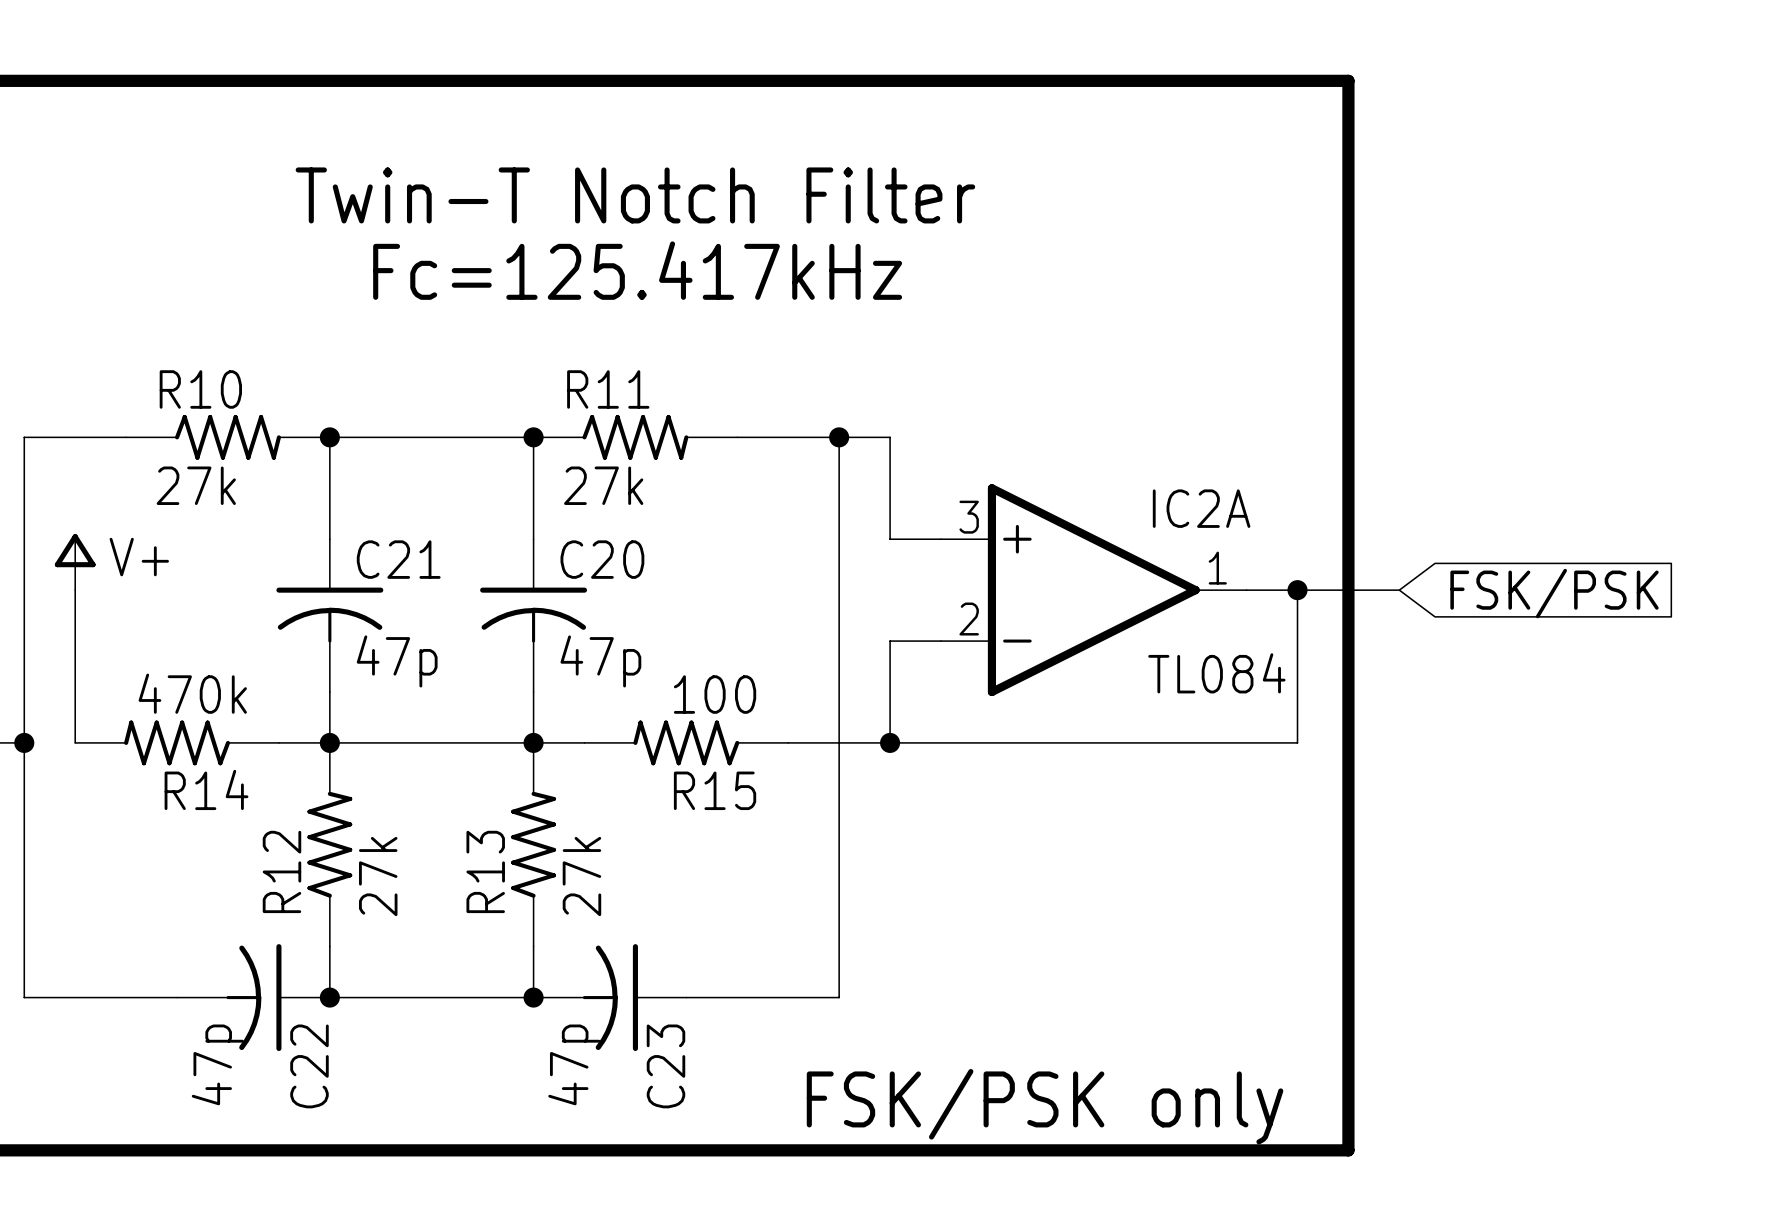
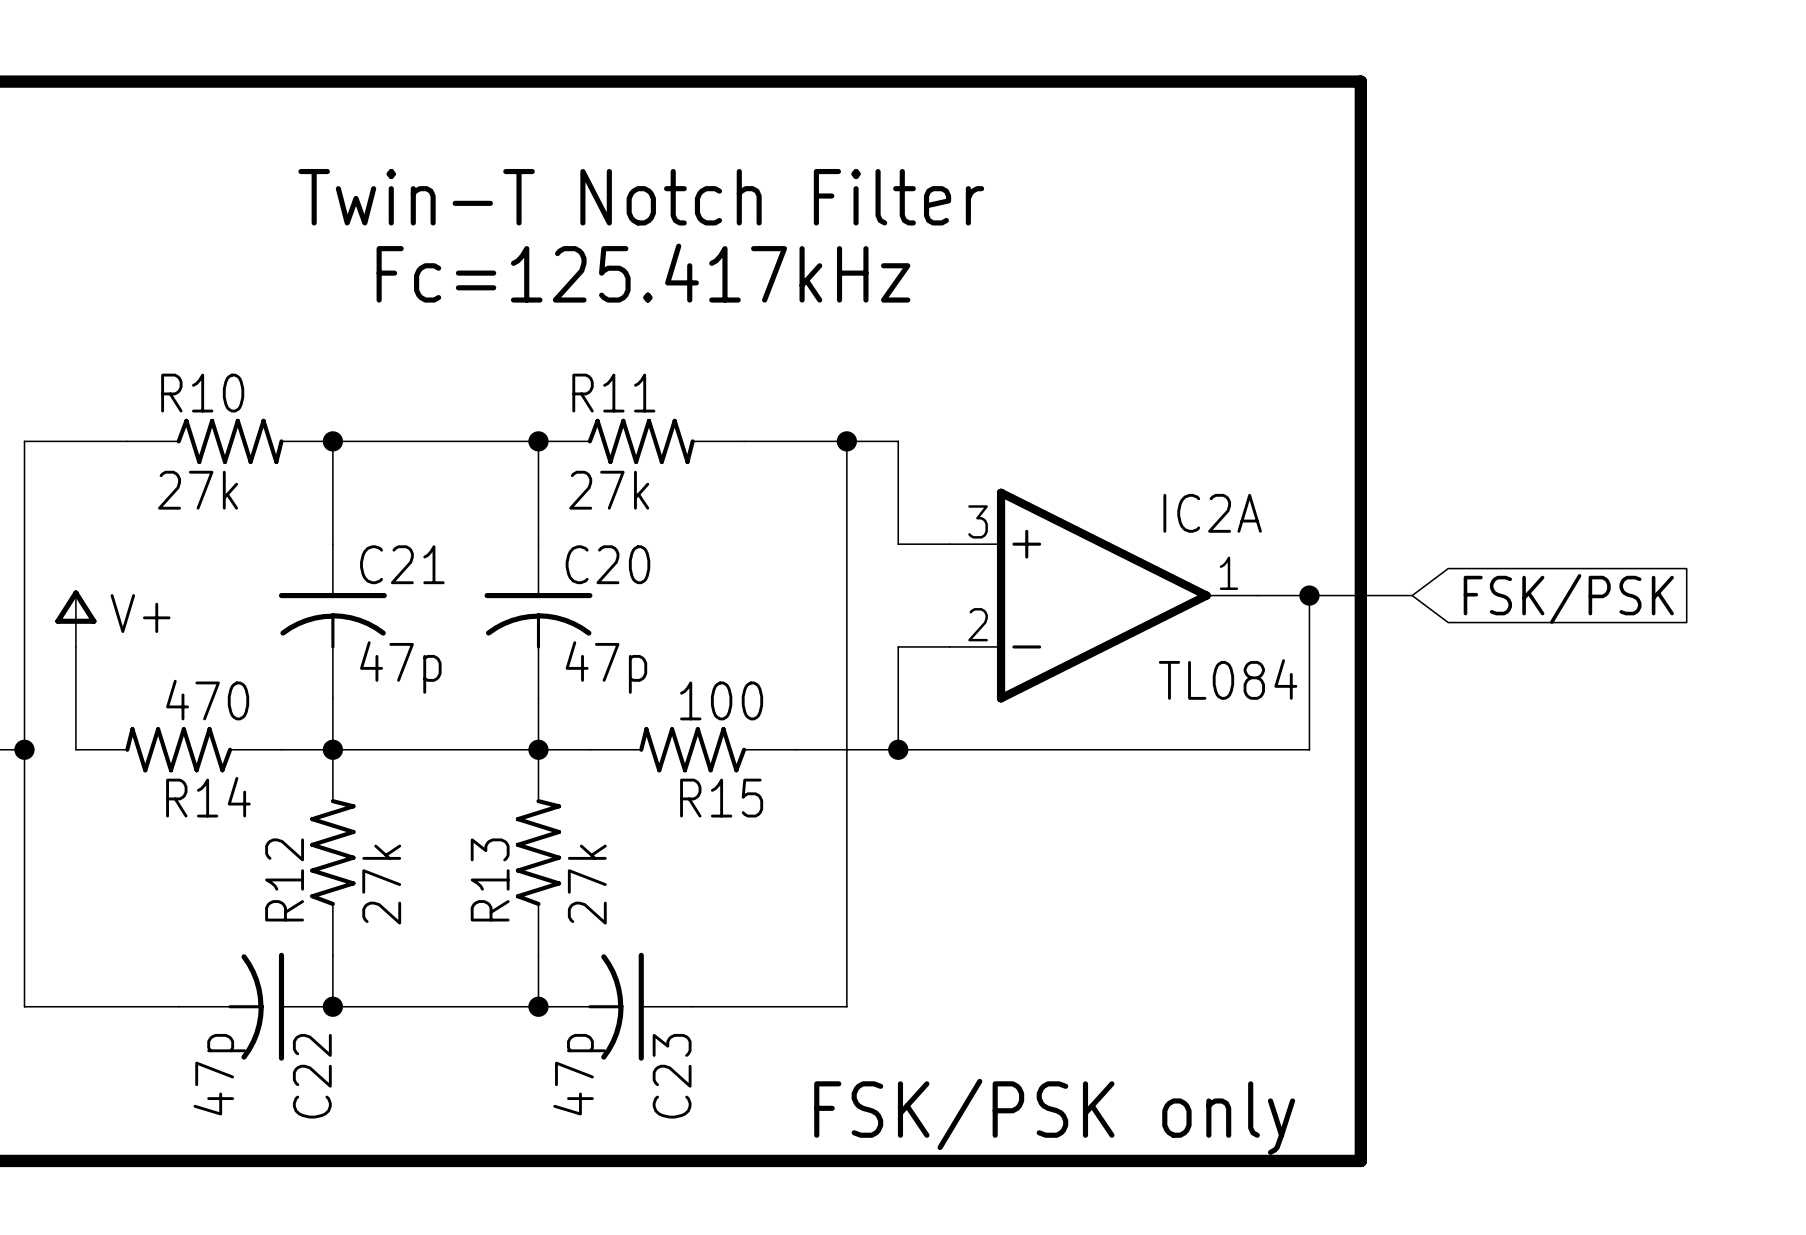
power symbol position: V+ (75, 562) -> V+ (75, 618)
R14 value: 470k (192, 693) -> 470 (207, 700)

